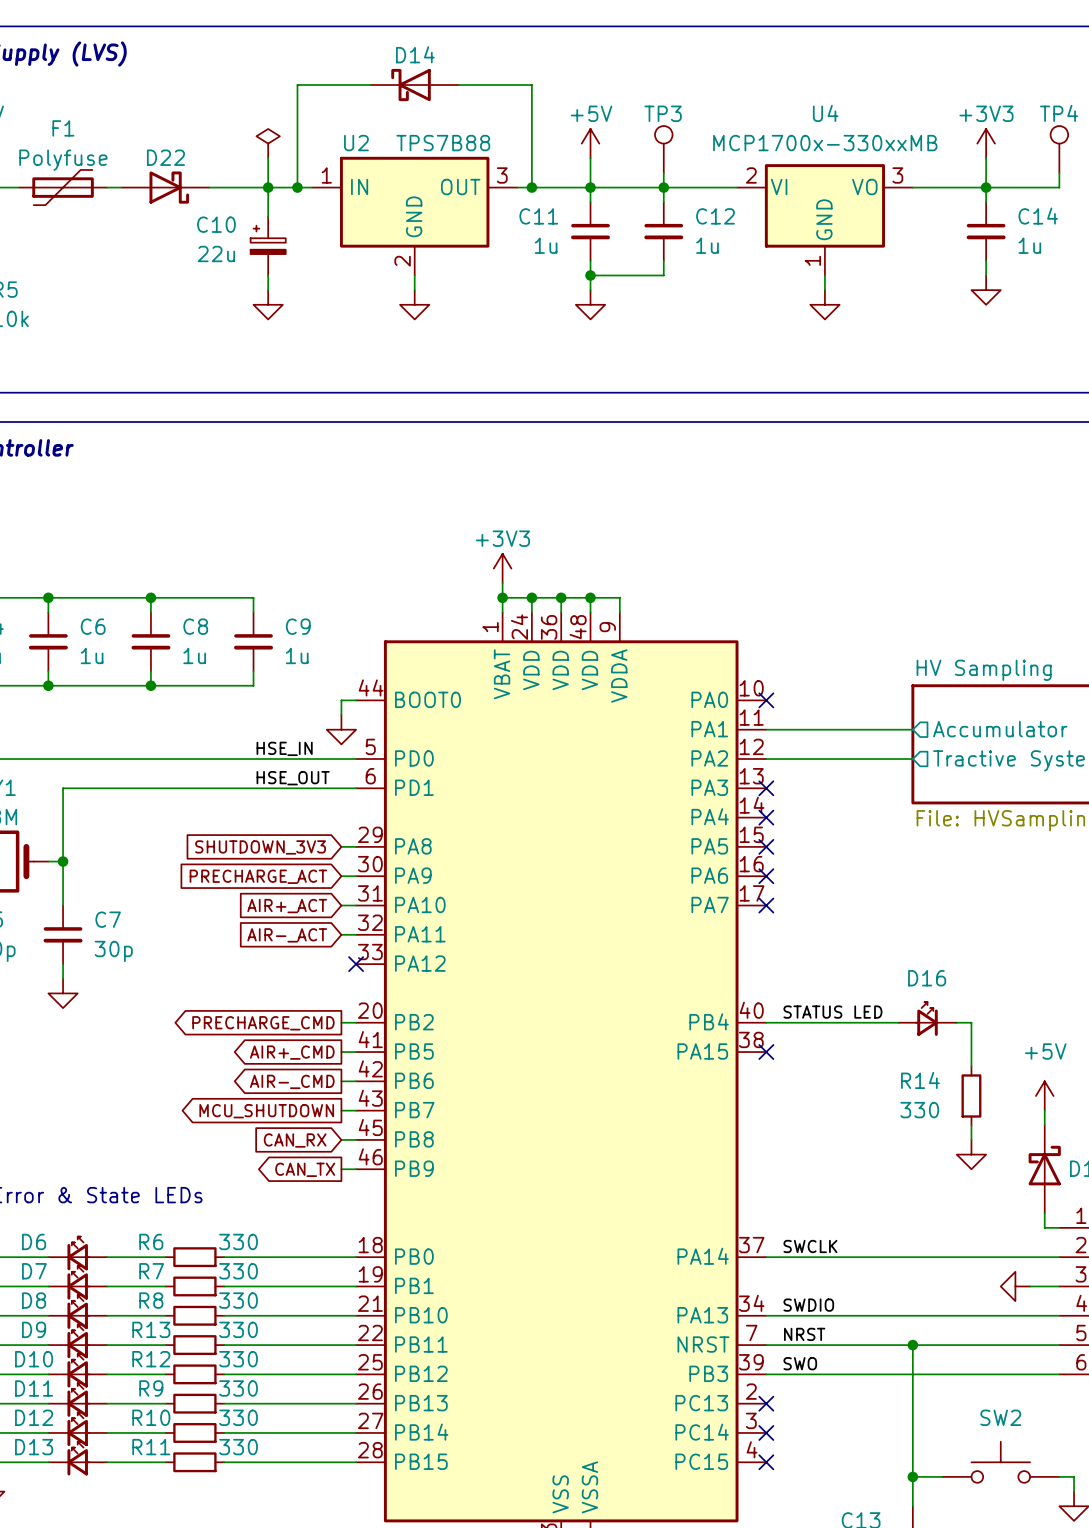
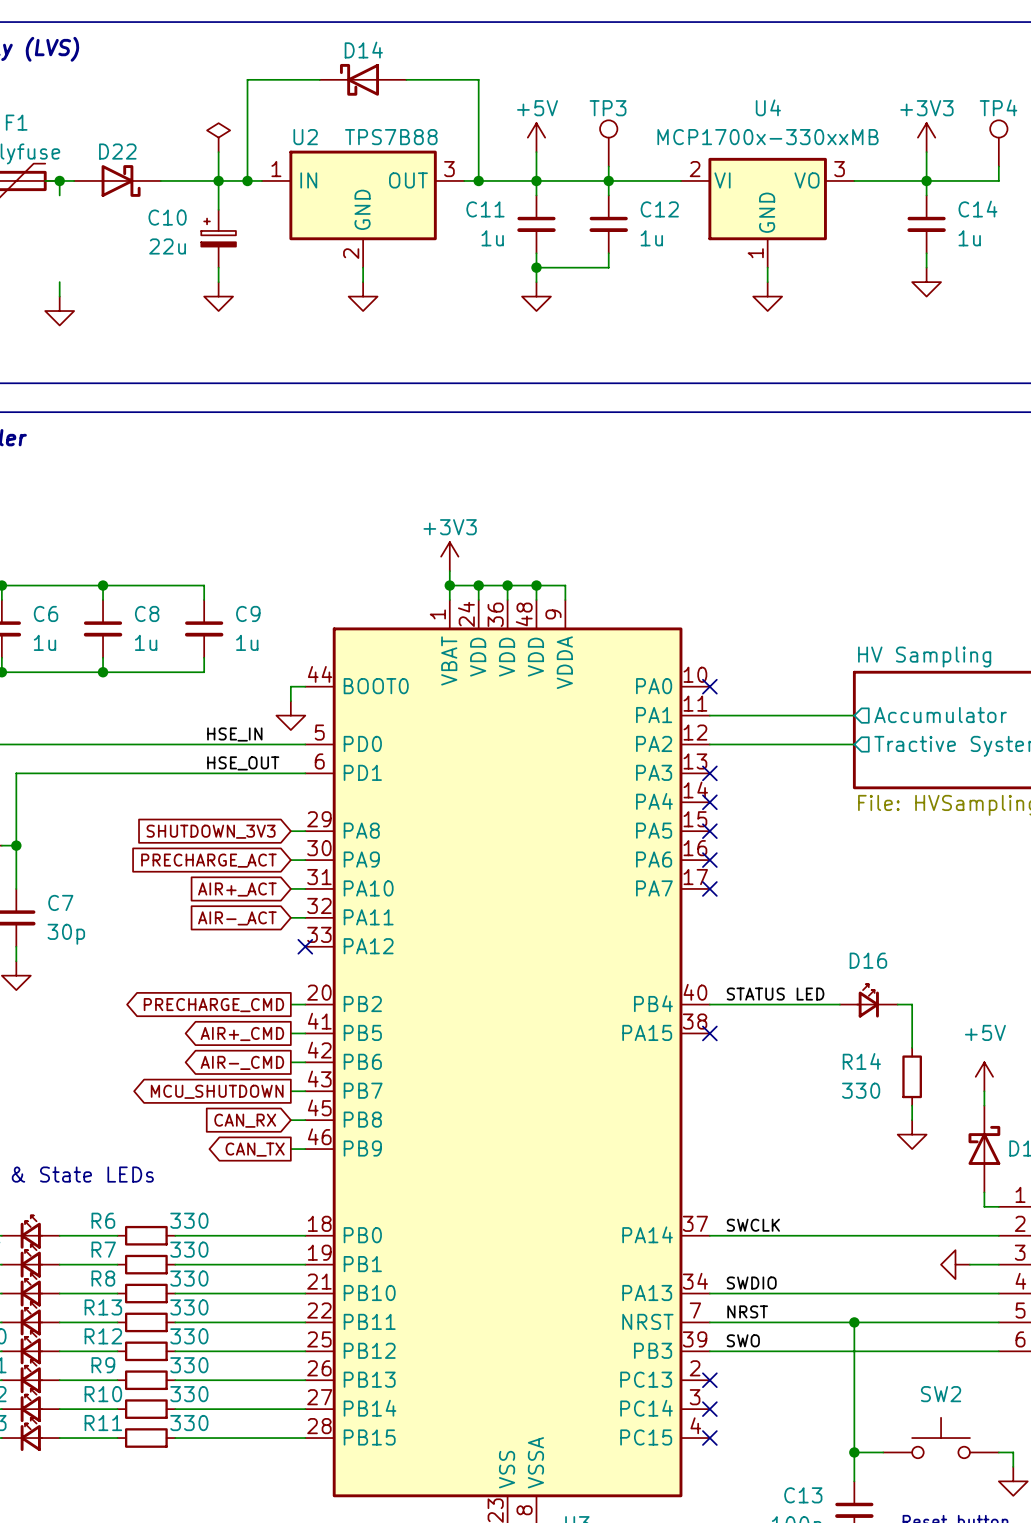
wire: none -> (45, 180) (59, 180) (59, 195)
junction: none -> (59, 180)
wire: none -> (59, 282) (59, 296)
power symbol: none -> (59, 311)

